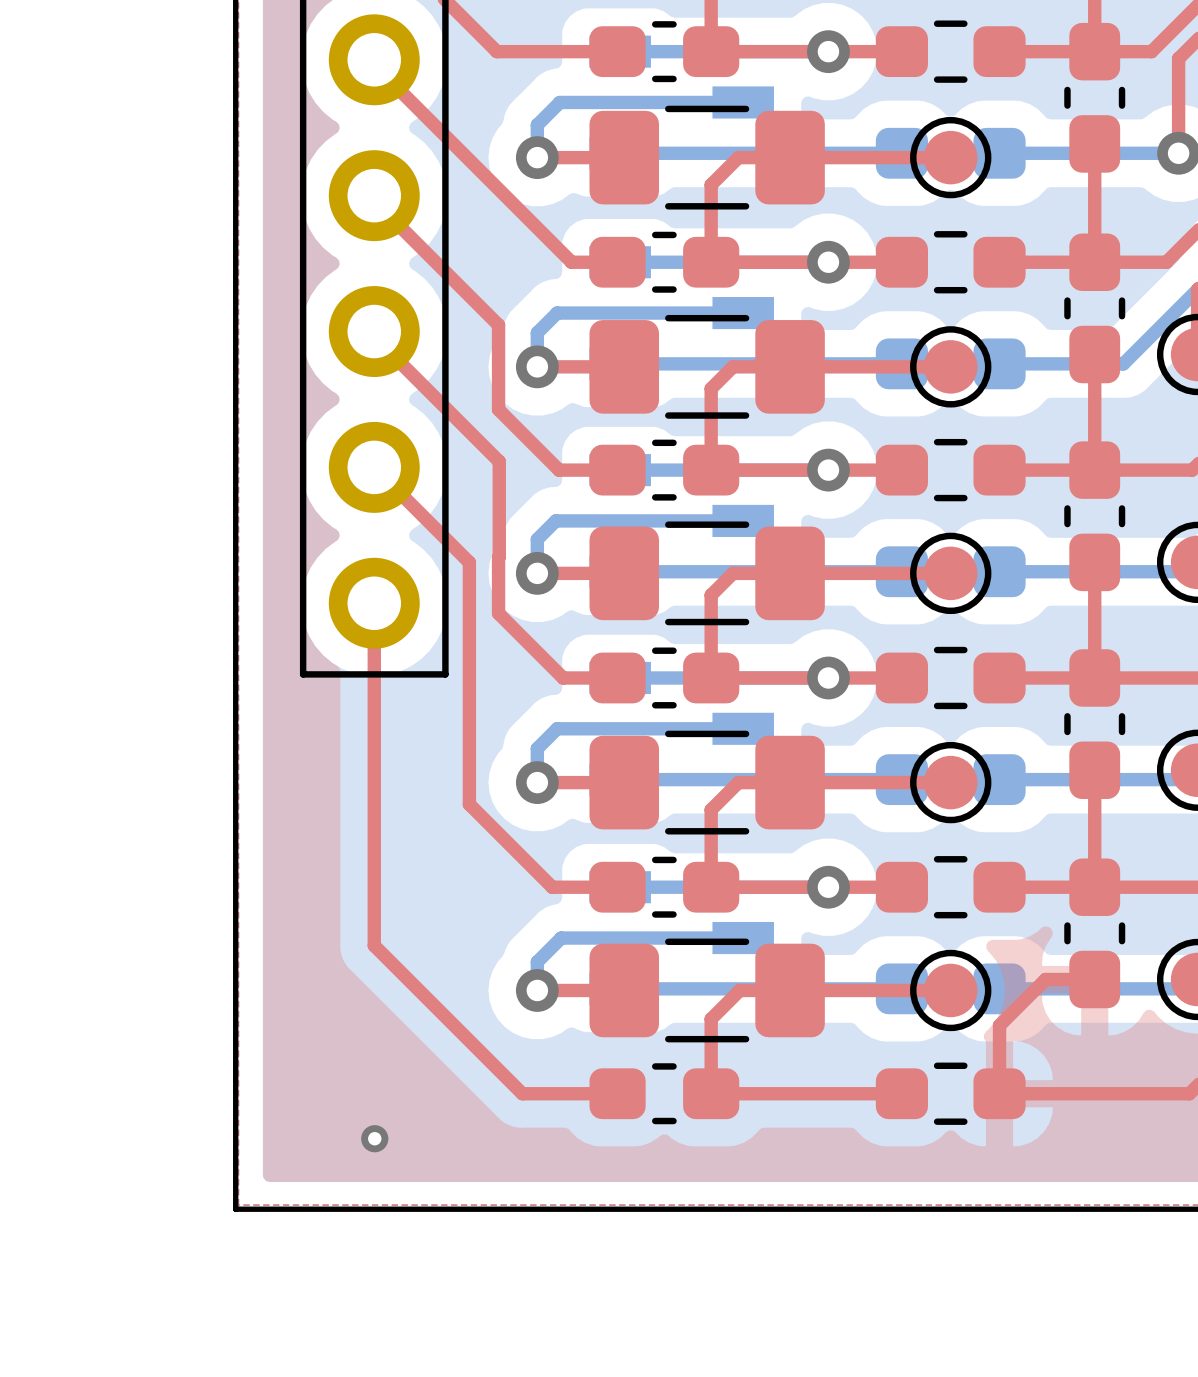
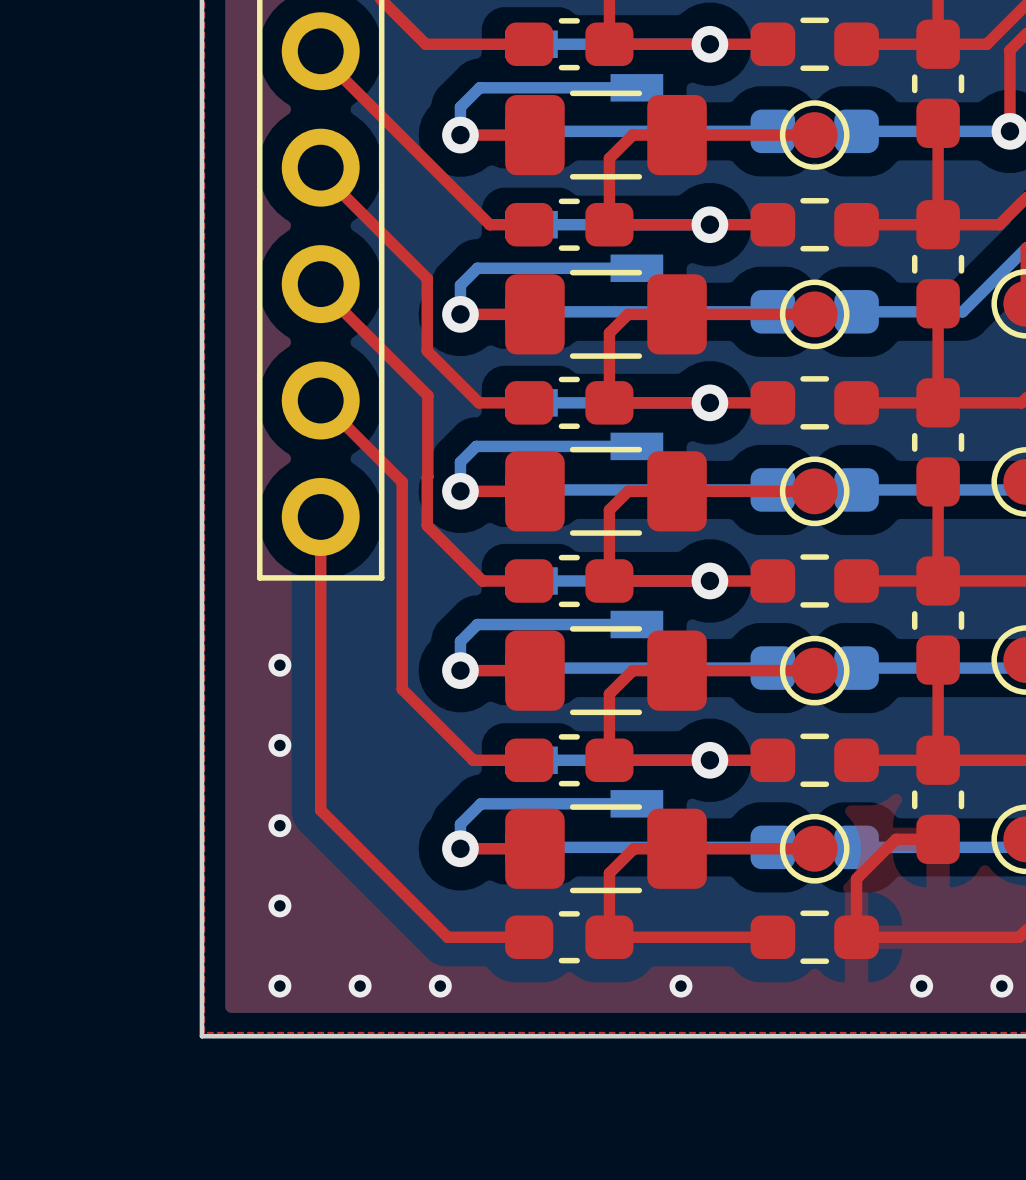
via: none -> (279, 665)
via: none -> (279, 745)
via: none -> (279, 825)
via: none -> (279, 905)
via: (374, 1138) -> none
via: none -> (279, 986)
via: none -> (360, 986)
via: none -> (440, 986)
via: none -> (680, 986)
via: none -> (921, 986)
via: none -> (1001, 986)

